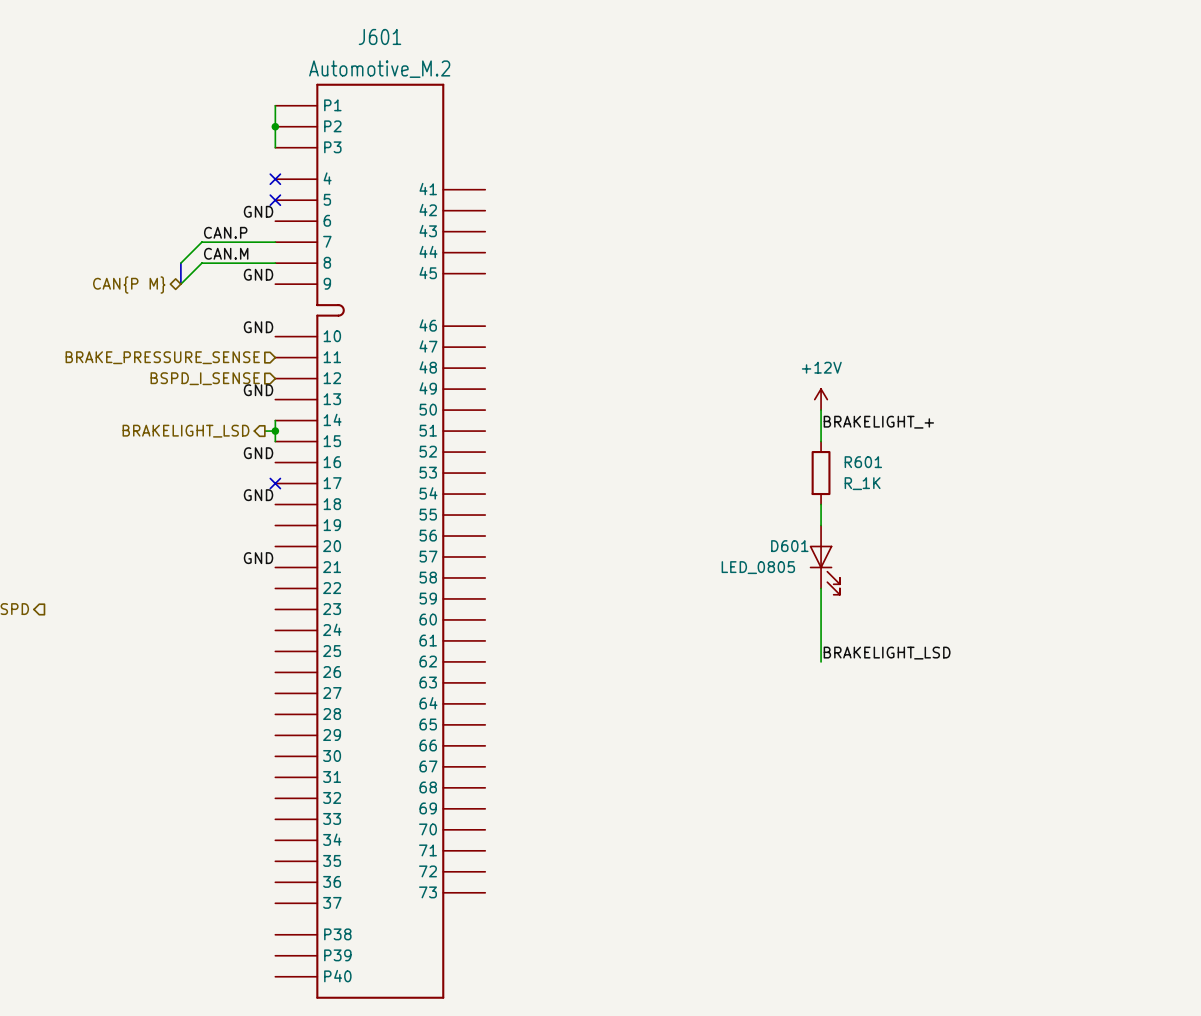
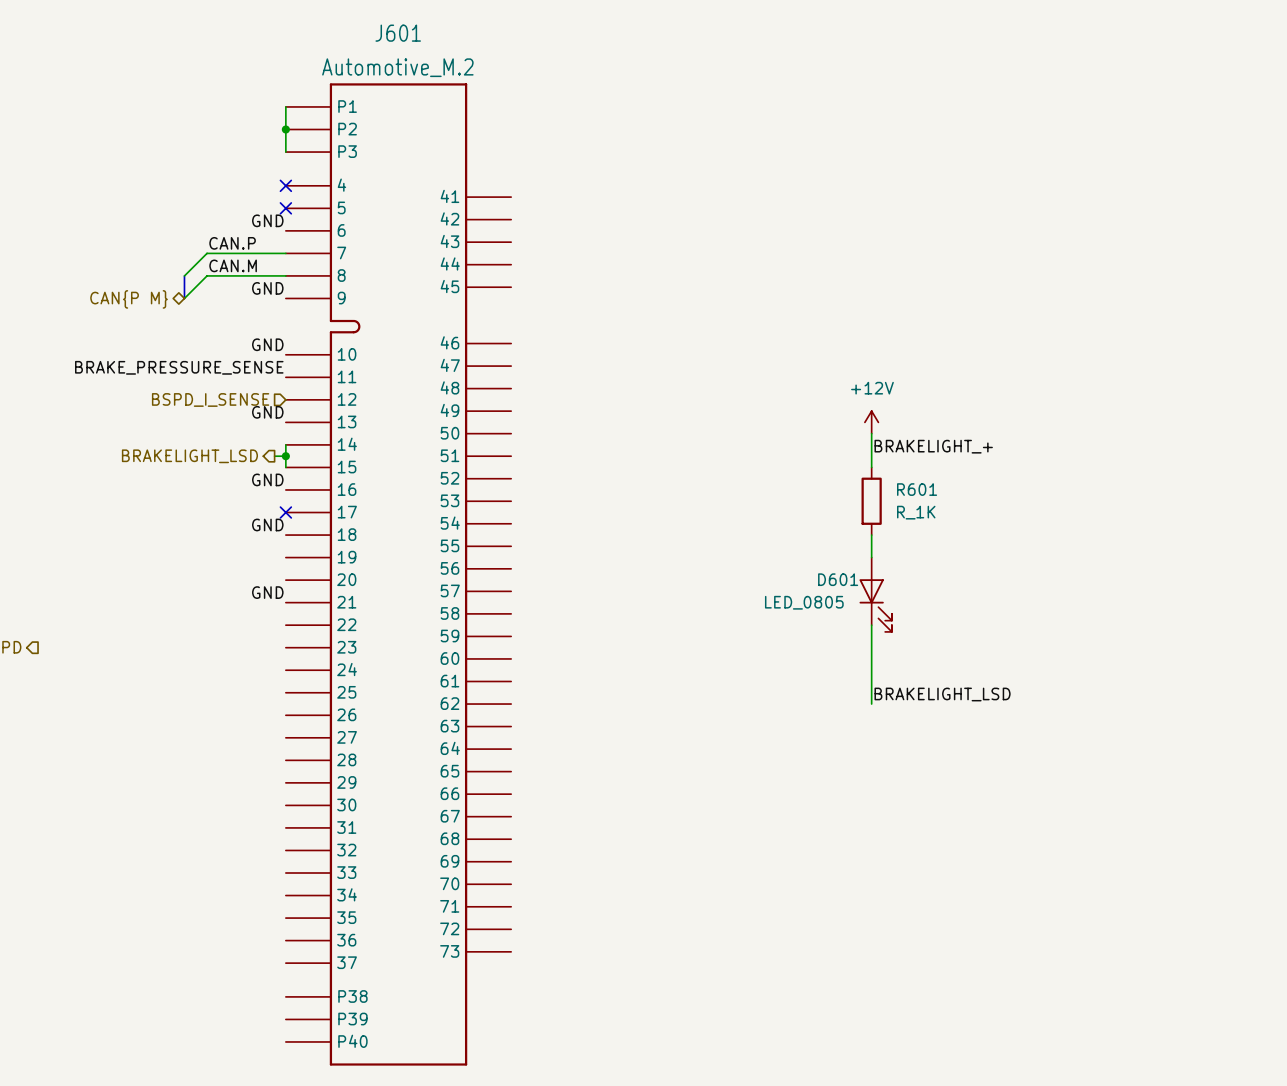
label: none -> BRAKE_PRESSURE_SENSE (179, 367)
hierarchical label: BRAKE_PRESSURE_SENSE (162, 357) -> none

